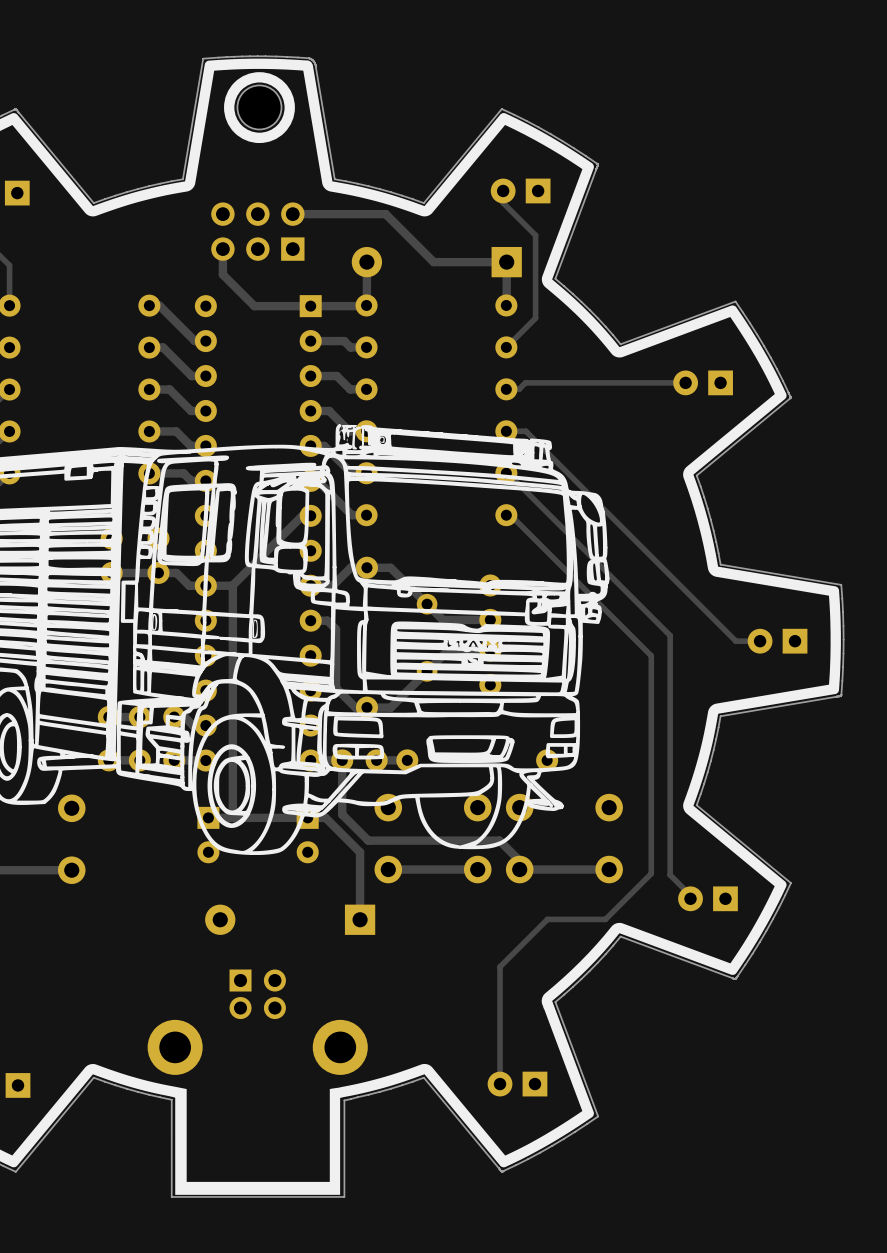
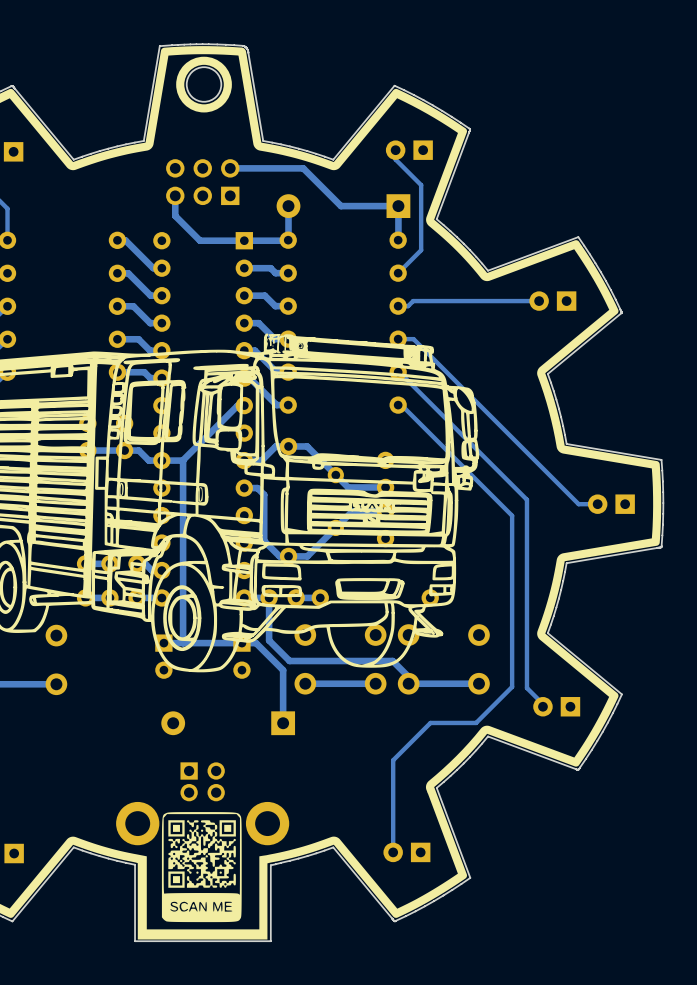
drawing: none -> [161, 812, 242, 923]

